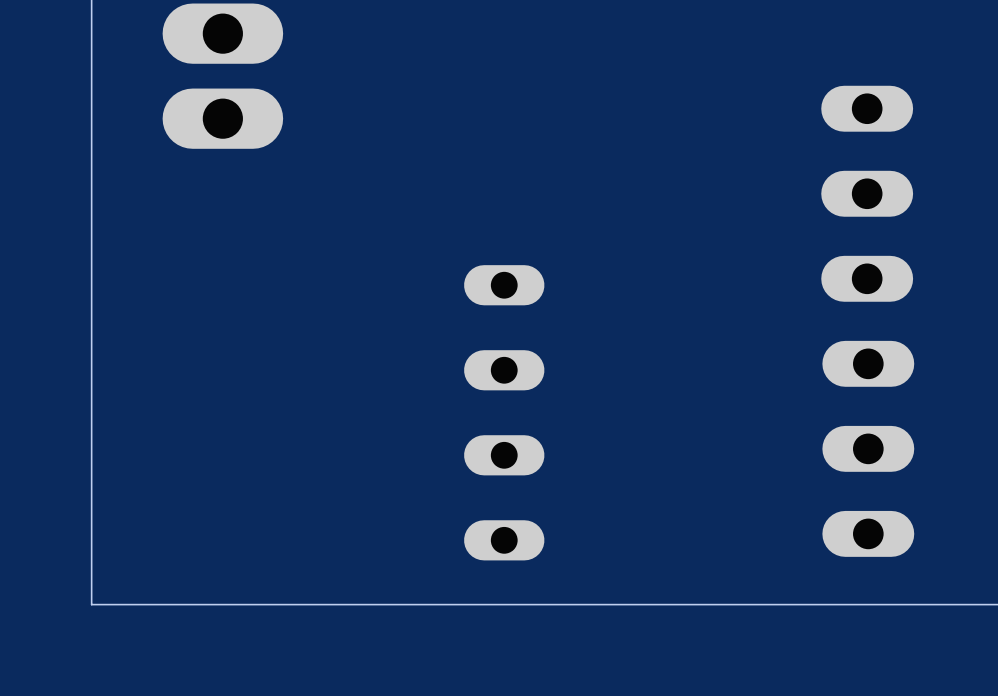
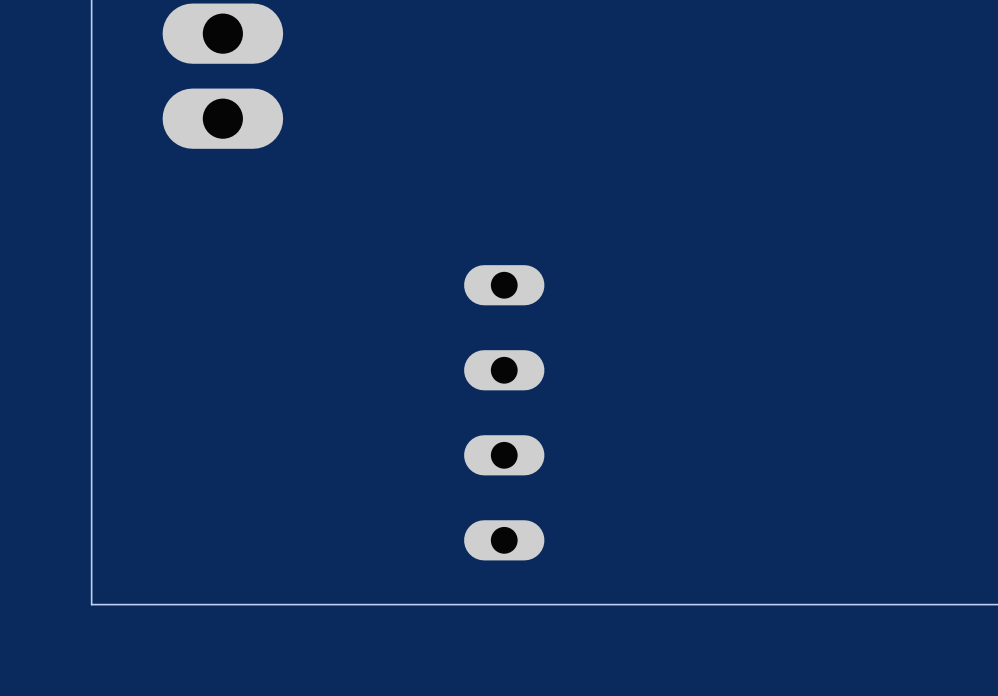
part: (867, 193) -> none
part: (868, 448) -> none

